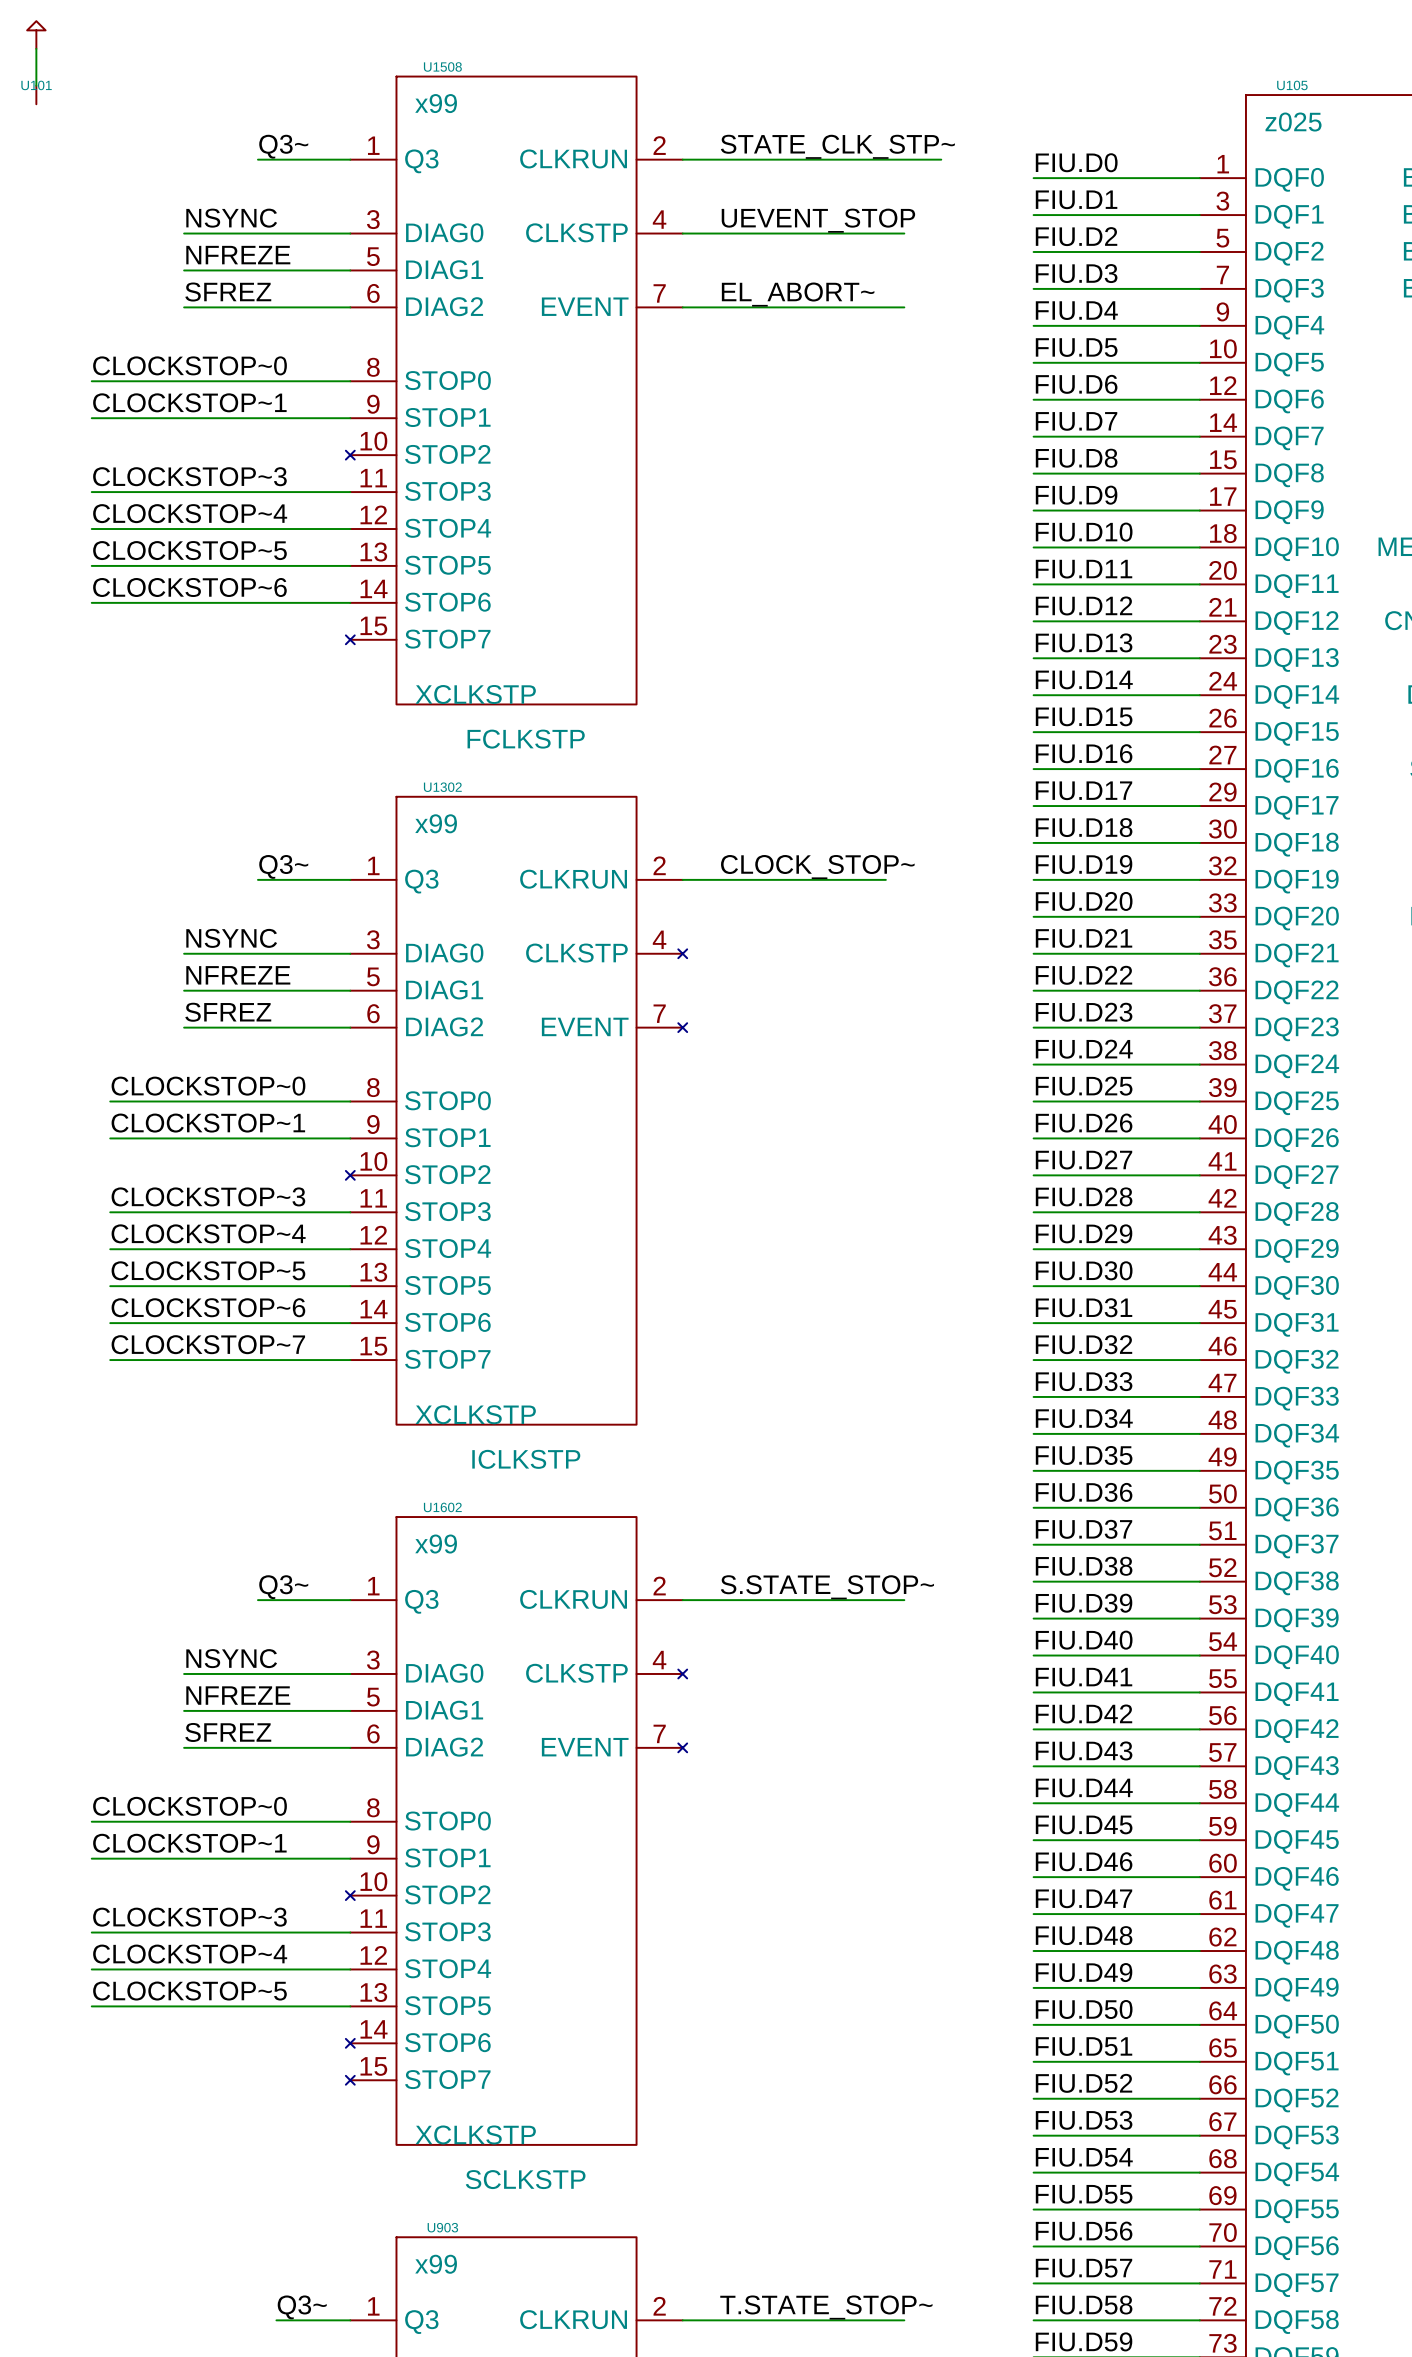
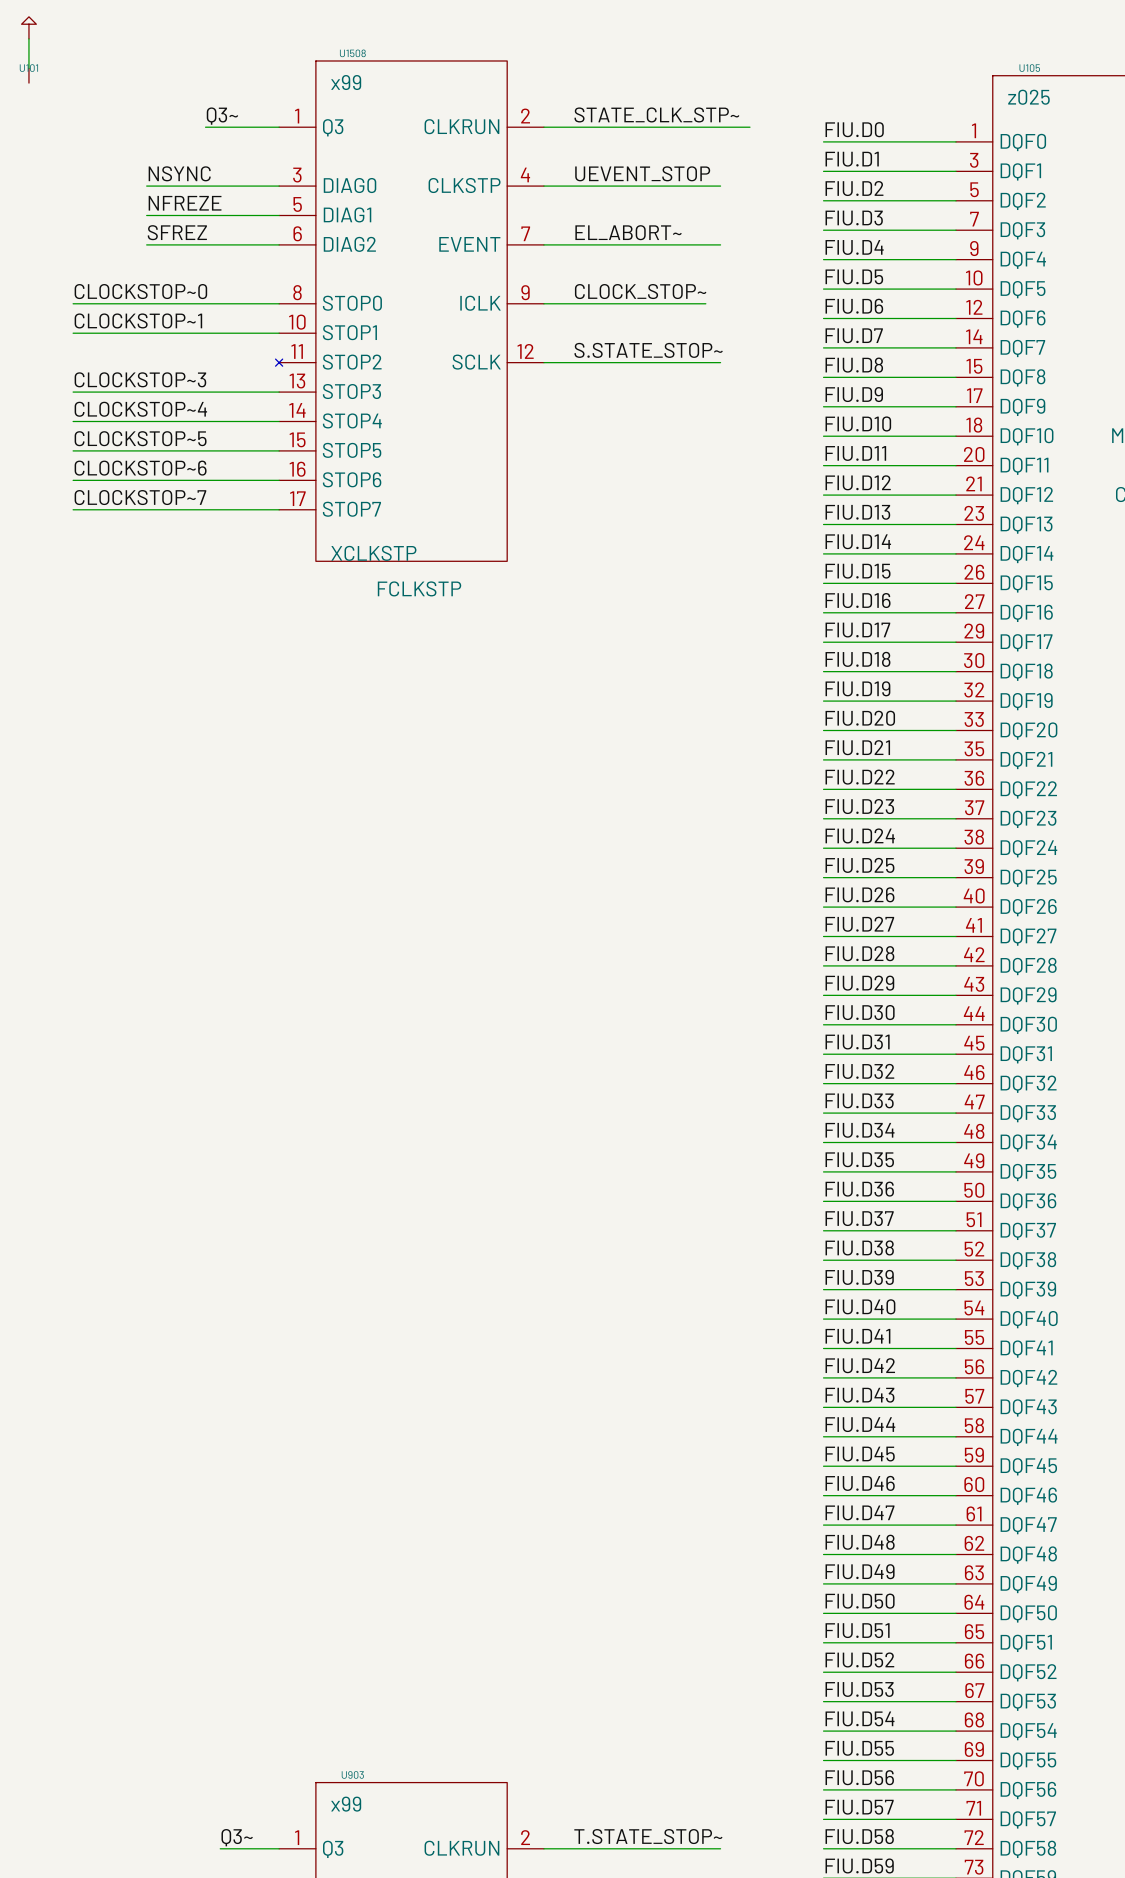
U1508 symbol: [350, 76, 683, 705] -> [279, 60, 544, 562]
label: none -> CLOCK_STOP~ (640, 291)
wire: none -> (543, 303) (705, 303)
label: none -> S.STATE_STOP~ (648, 350)
wire: none -> (543, 362) (720, 362)
label: none -> CLOCKSTOP~7 (140, 497)
wire: none -> (73, 509) (279, 509)
no-connect mark: (350, 639) -> none
label: Q3~ (283, 866) -> none
label: CLOCK_STOP~ (817, 867) -> none
wire: (257, 879) (350, 879) -> none
wire: (682, 879) (885, 879) -> none
label: NSYNC (231, 938) -> none
wire: (184, 953) (350, 953) -> none
no-connect mark: (682, 953) -> none
label: NFREZE (238, 975) -> none
wire: (184, 990) (350, 990) -> none
label: SFREZ (228, 1012) -> none
wire: (184, 1027) (350, 1027) -> none
no-connect mark: (682, 1027) -> none
label: CLOCKSTOP~0 (208, 1086) -> none
wire: (110, 1101) (350, 1101) -> none
U1302: XCLKSTP (516, 1110) -> none
label: CLOCKSTOP~1 (208, 1123) -> none
wire: (110, 1138) (350, 1138) -> none
no-connect mark: (350, 1175) -> none
label: CLOCKSTOP~3 (208, 1196) -> none
wire: (110, 1212) (350, 1212) -> none
label: CLOCKSTOP~4 (208, 1233) -> none
wire: (110, 1249) (350, 1249) -> none
label: CLOCKSTOP~5 (208, 1270) -> none
wire: (110, 1286) (350, 1286) -> none
label: CLOCKSTOP~6 (208, 1307) -> none
wire: (110, 1323) (350, 1323) -> none
label: CLOCKSTOP~7 (208, 1344) -> none
wire: (110, 1360) (350, 1360) -> none
label: Q3~ (283, 1587) -> none
label: S.STATE_STOP~ (827, 1587) -> none
wire: (257, 1600) (350, 1600) -> none
wire: (682, 1600) (904, 1600) -> none
label: NSYNC (231, 1658) -> none
wire: (184, 1673) (350, 1673) -> none
no-connect mark: (682, 1673) -> none
label: NFREZE (238, 1695) -> none
wire: (184, 1710) (350, 1710) -> none
label: SFREZ (228, 1732) -> none
wire: (184, 1747) (350, 1747) -> none
no-connect mark: (682, 1747) -> none
label: CLOCKSTOP~0 (190, 1806) -> none
wire: (91, 1821) (350, 1821) -> none
U1602: XCLKSTP (516, 1830) -> none
label: CLOCKSTOP~1 (189, 1843) -> none
wire: (91, 1858) (350, 1858) -> none
no-connect mark: (350, 1895) -> none
label: CLOCKSTOP~3 (189, 1917) -> none
wire: (91, 1932) (350, 1932) -> none
label: CLOCKSTOP~4 (190, 1954) -> none
wire: (91, 1969) (350, 1969) -> none
label: CLOCKSTOP~5 (189, 1991) -> none
wire: (91, 2006) (350, 2006) -> none
no-connect mark: (350, 2043) -> none
no-connect mark: (350, 2080) -> none

